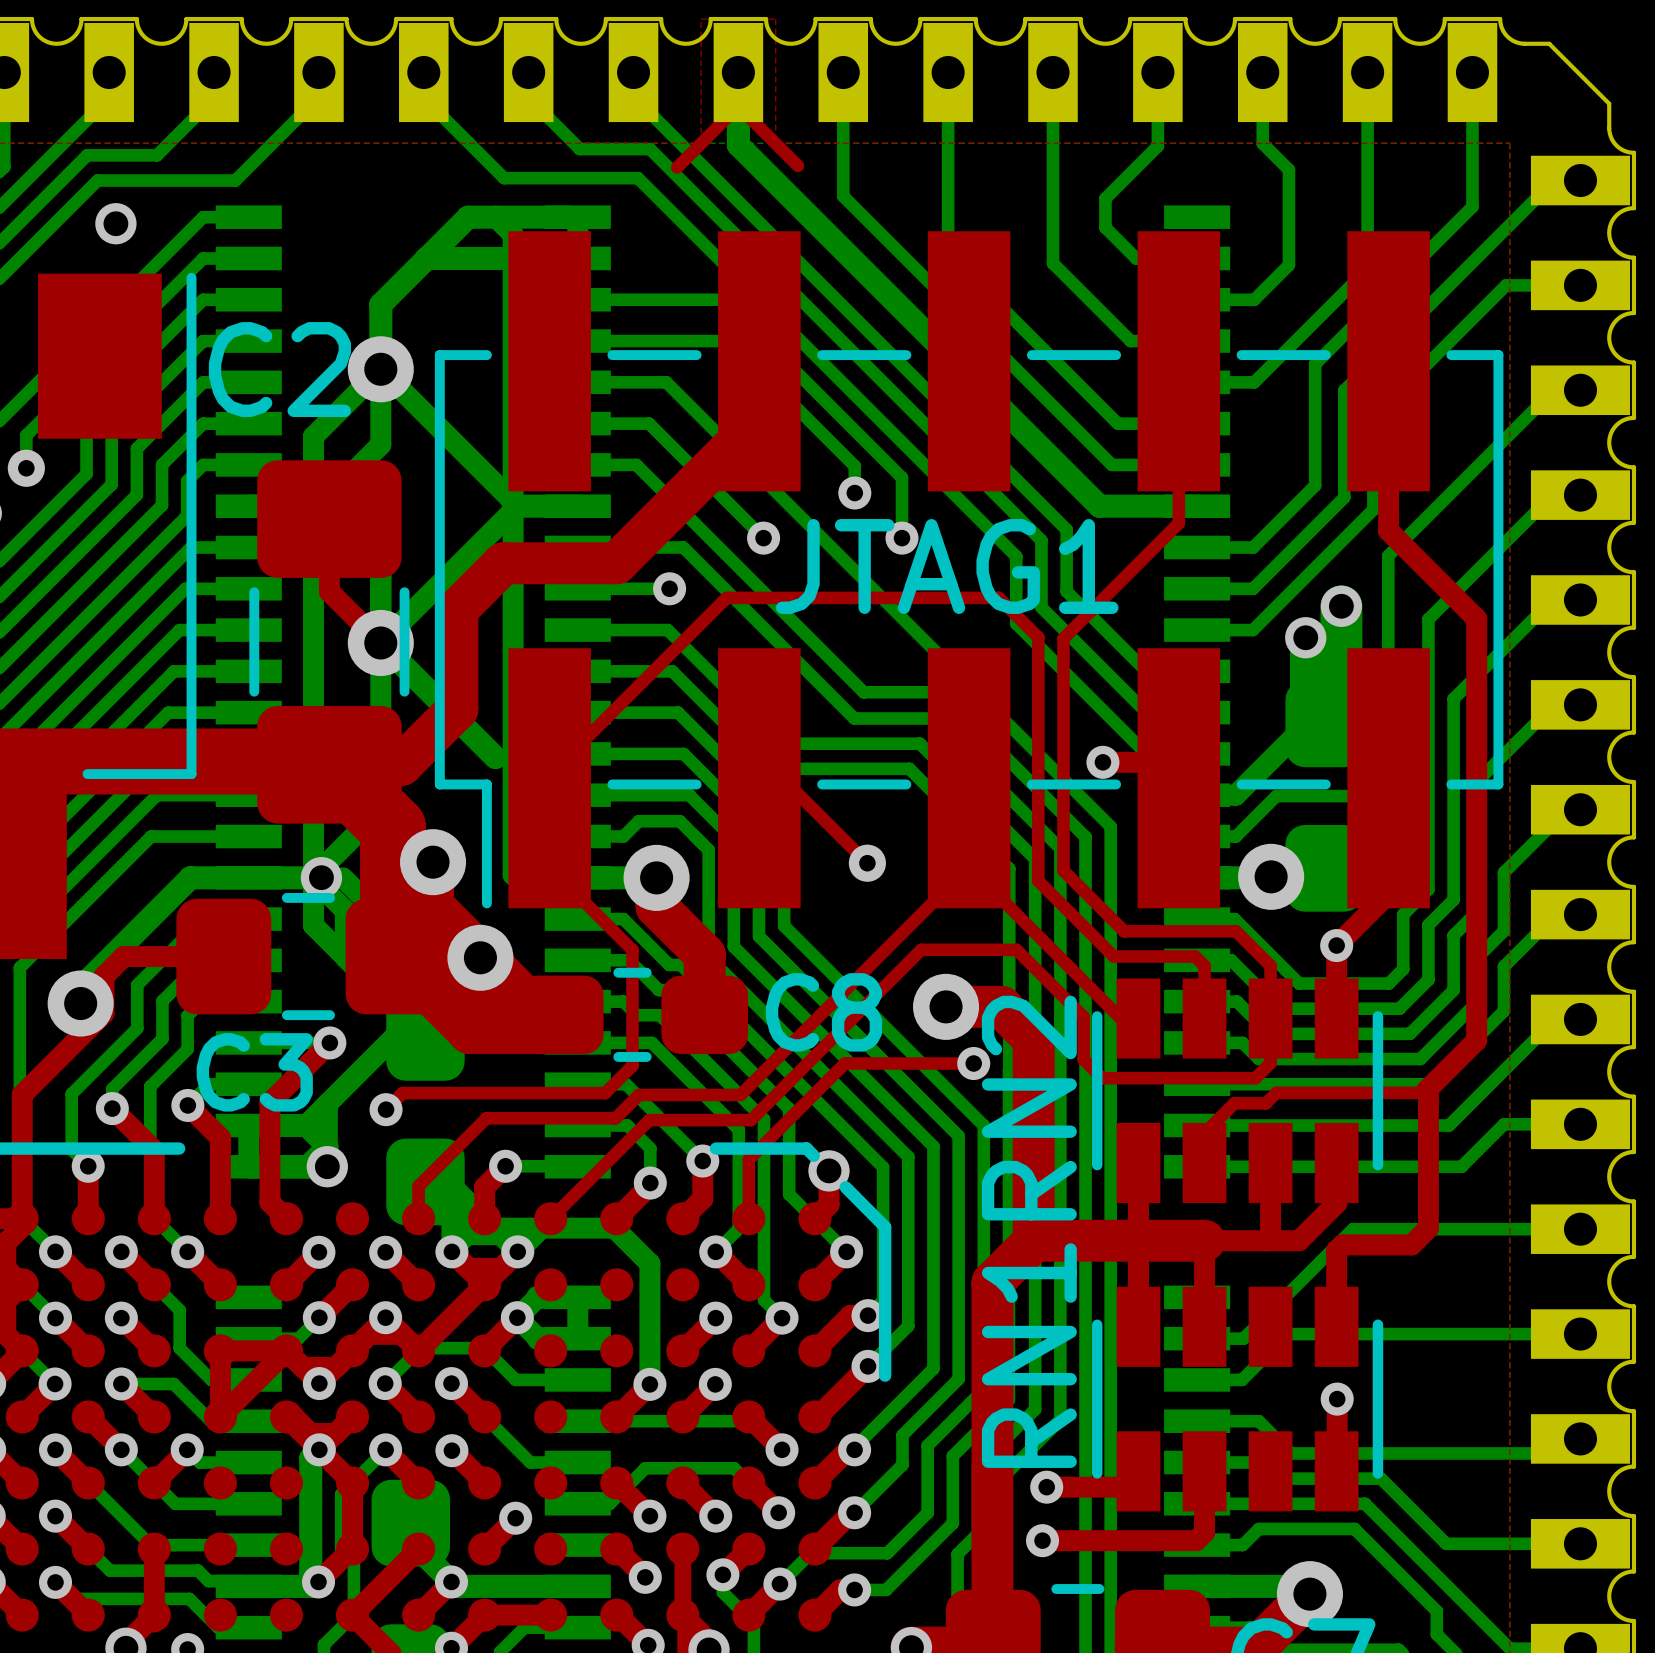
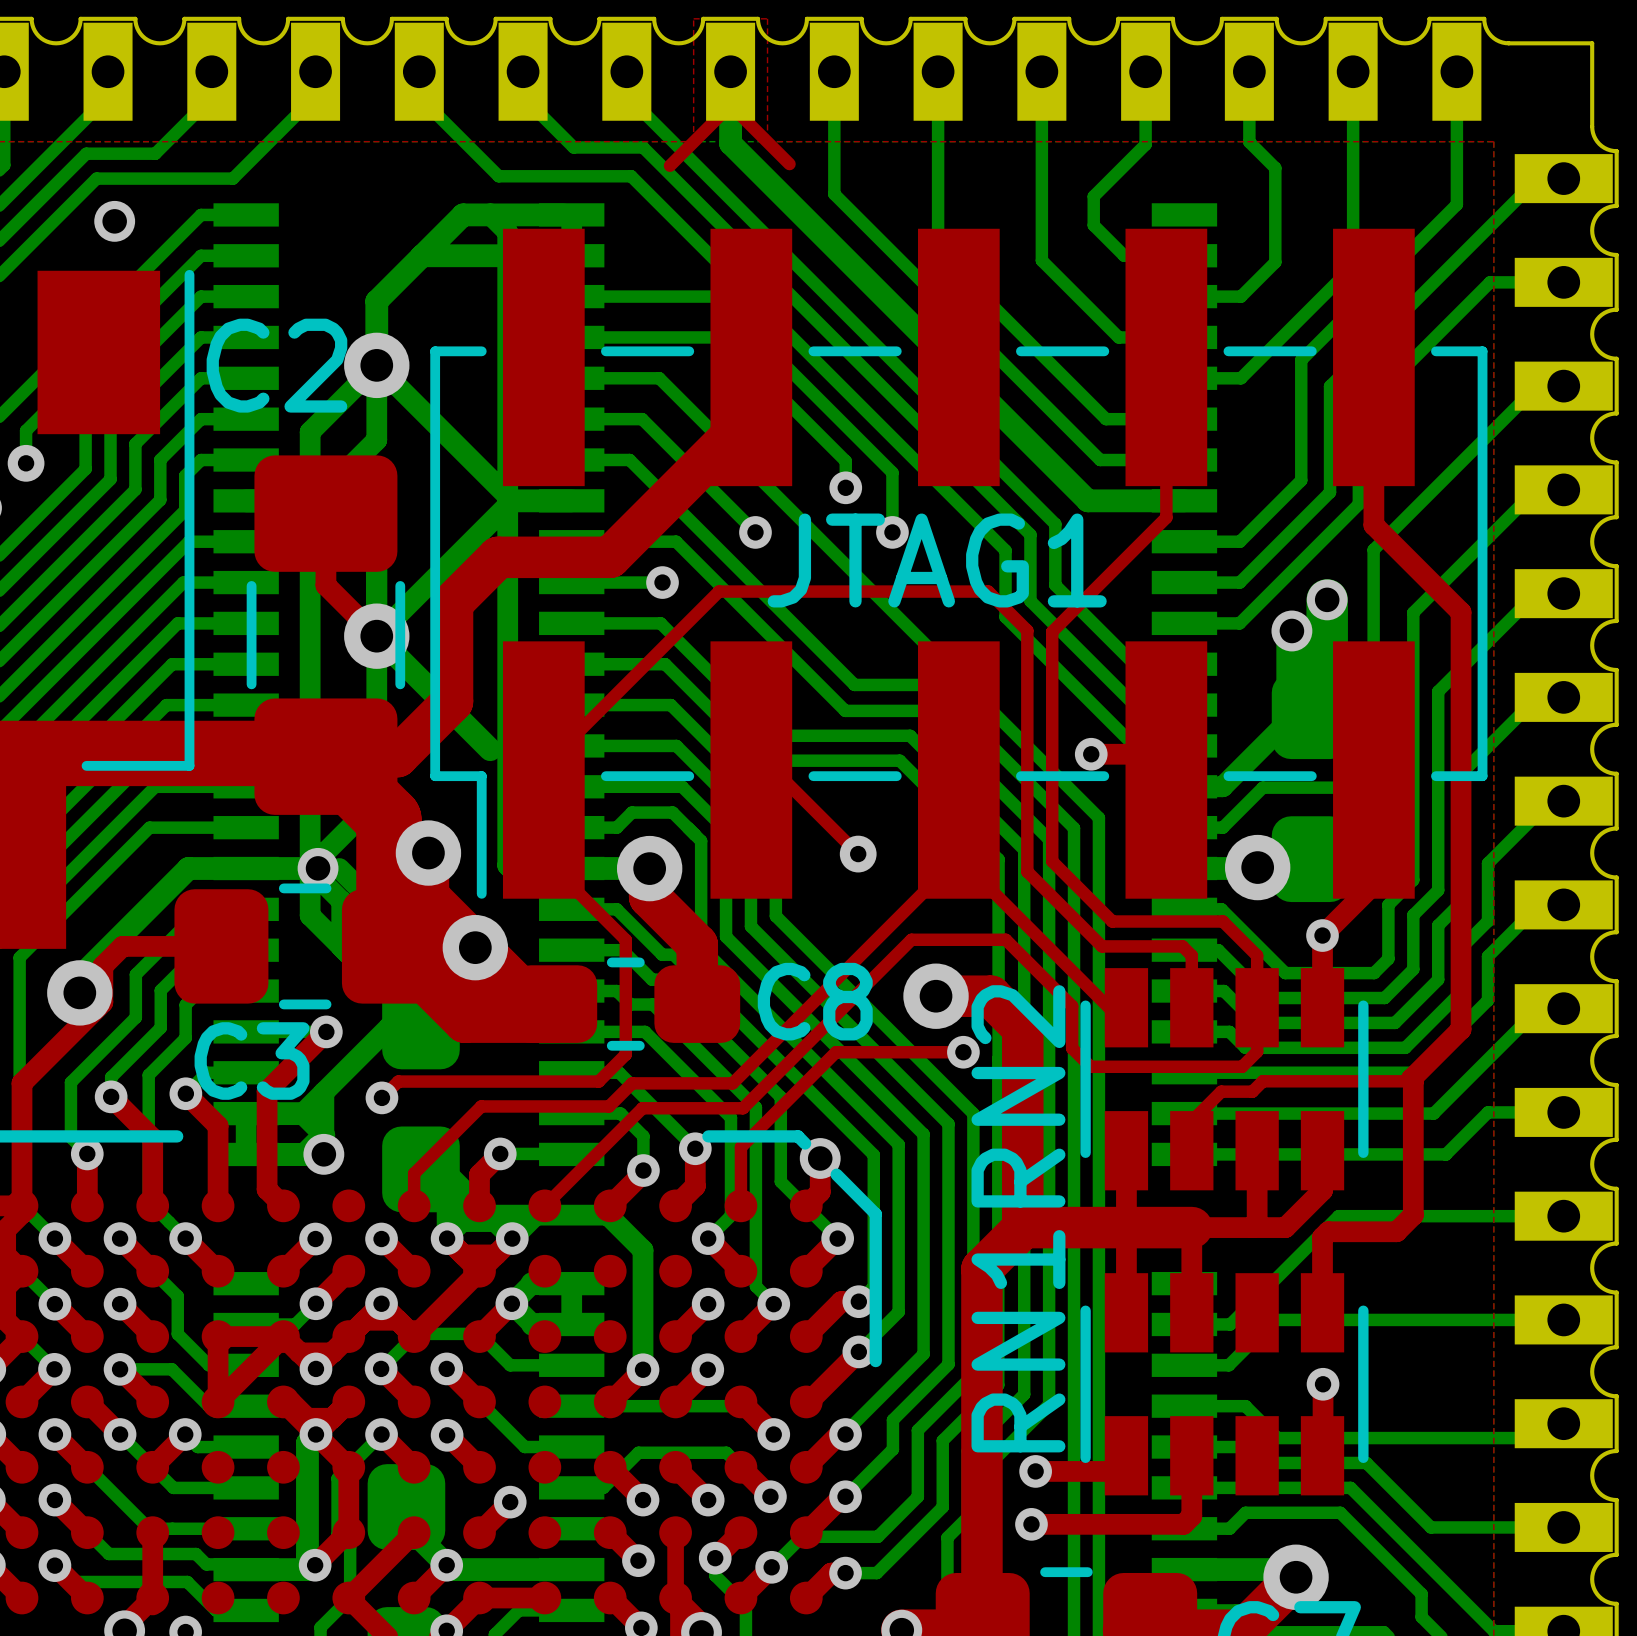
board edge: (1524, 43) (1549, 43) (1609, 103) -> (1508, 43) (1592, 43) (1592, 102)

